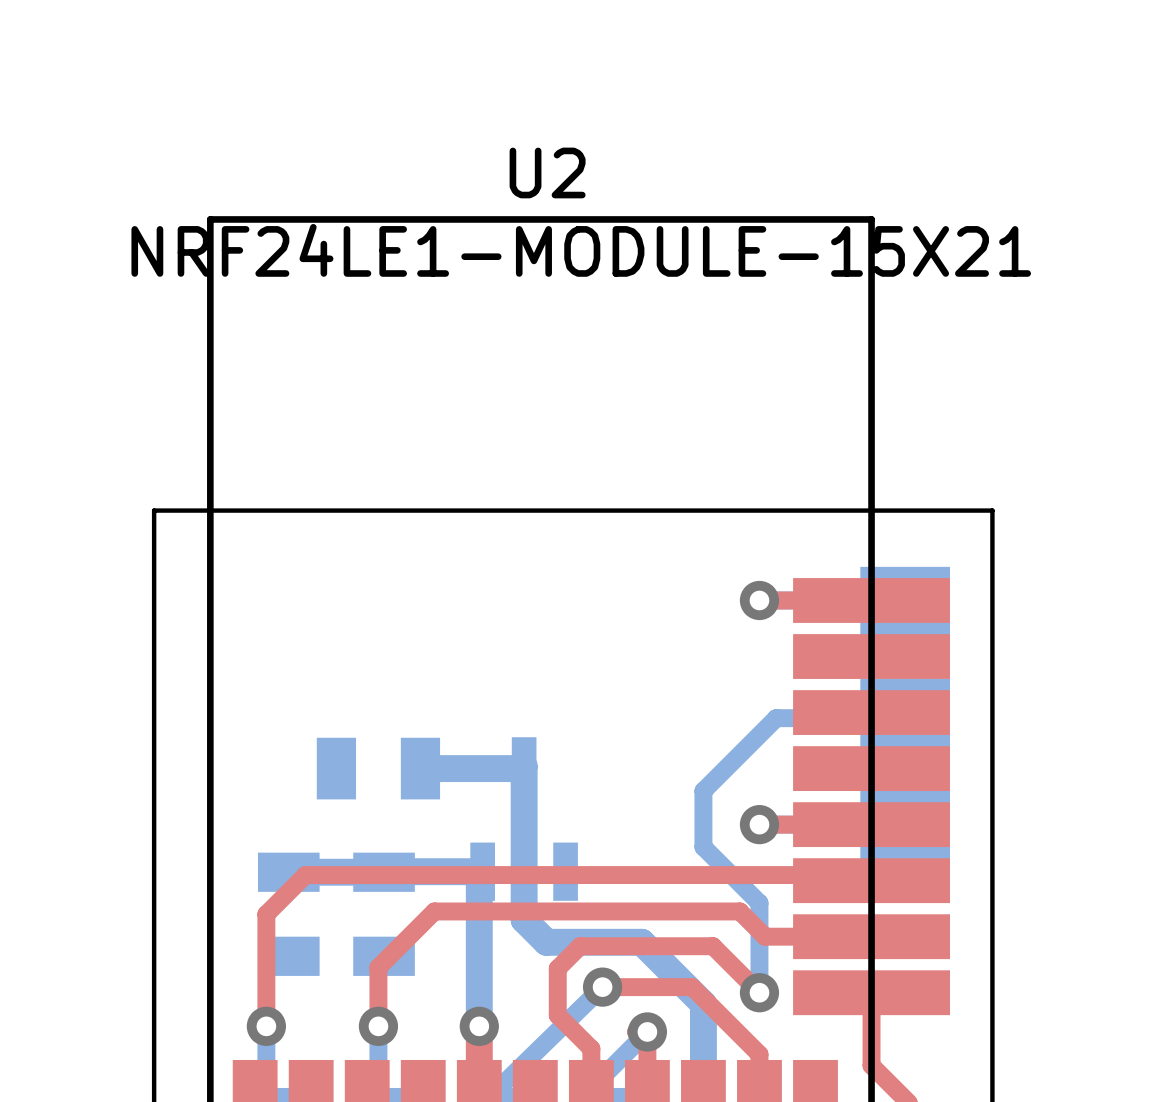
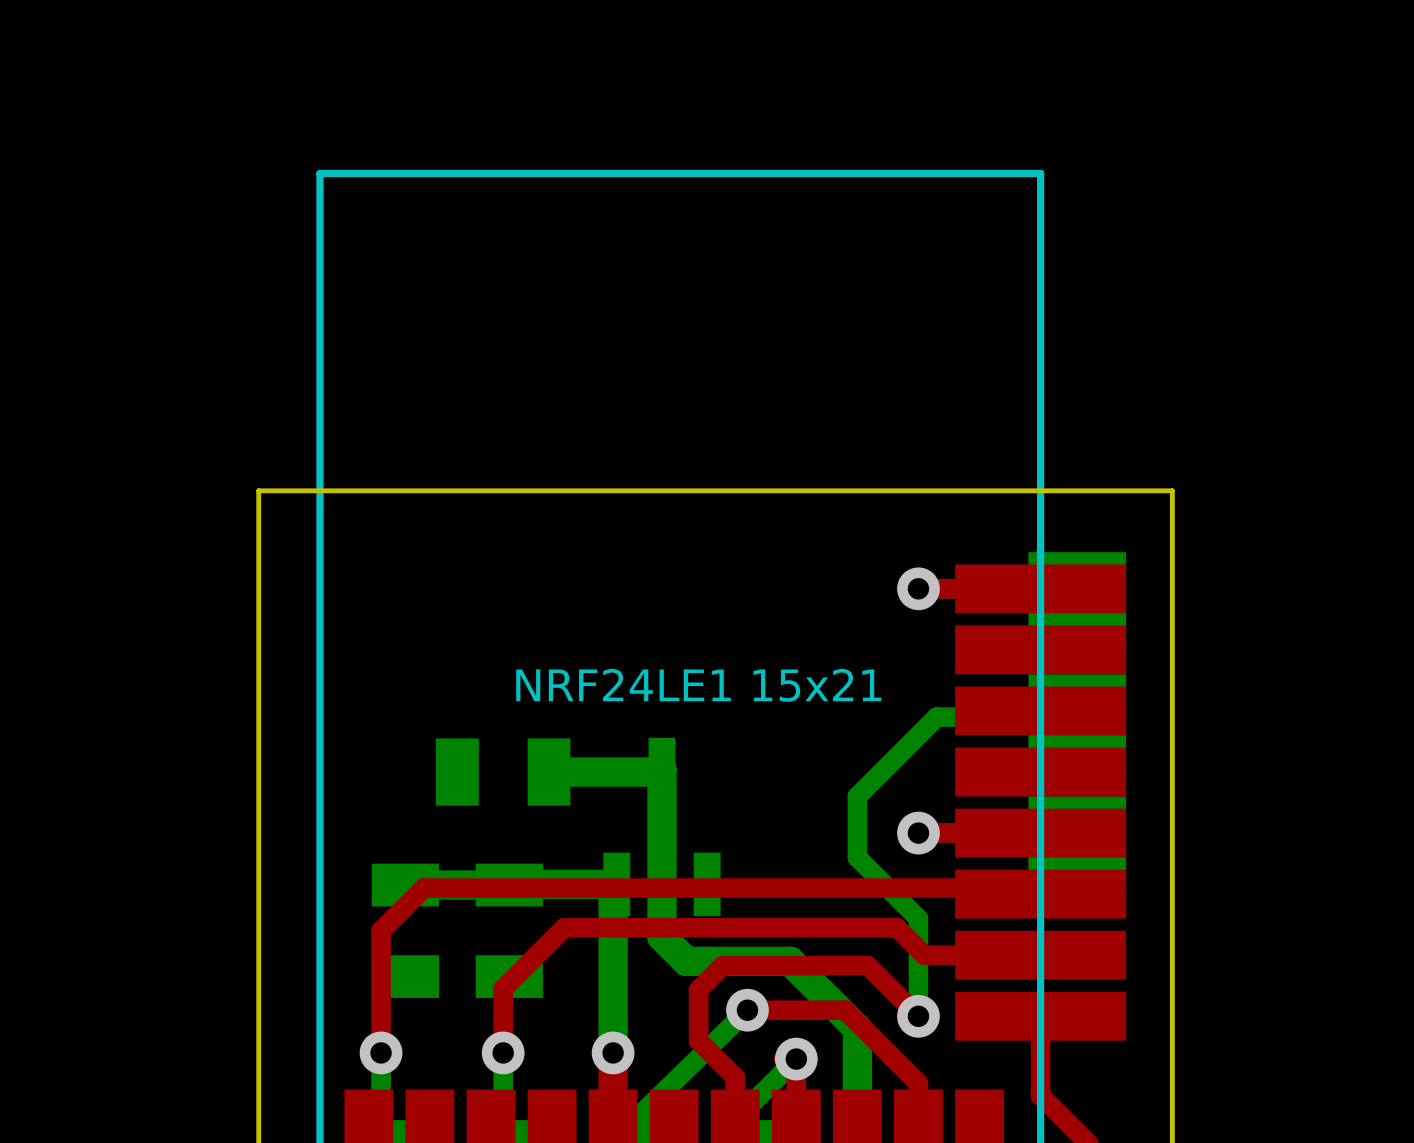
U2 name: U2 (547, 172) -> none
U2 value: NRF24LE1-MODULE-15X21 (581, 250) -> NRF24LE1 15x21 (698, 685)

